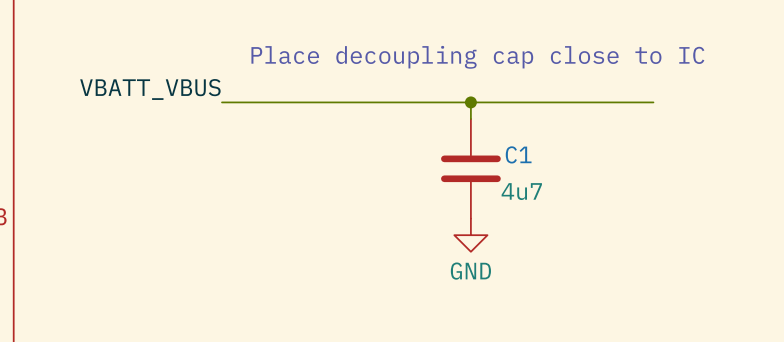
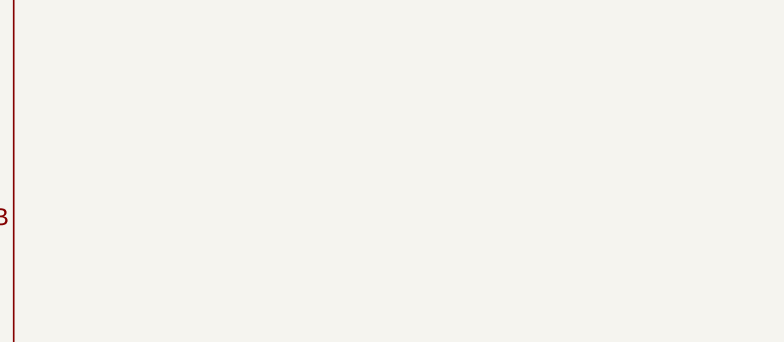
text: Place decoupling cap close to IC (477, 57) -> none
label: VBATT_VBUS (150, 89) -> none
wire: (221, 102) (653, 102) -> none
wire: (470, 102) (470, 119) -> none
junction: (470, 102) -> none
C1: 4u7 (470, 168) -> none
power symbol: GND (470, 235) -> none

